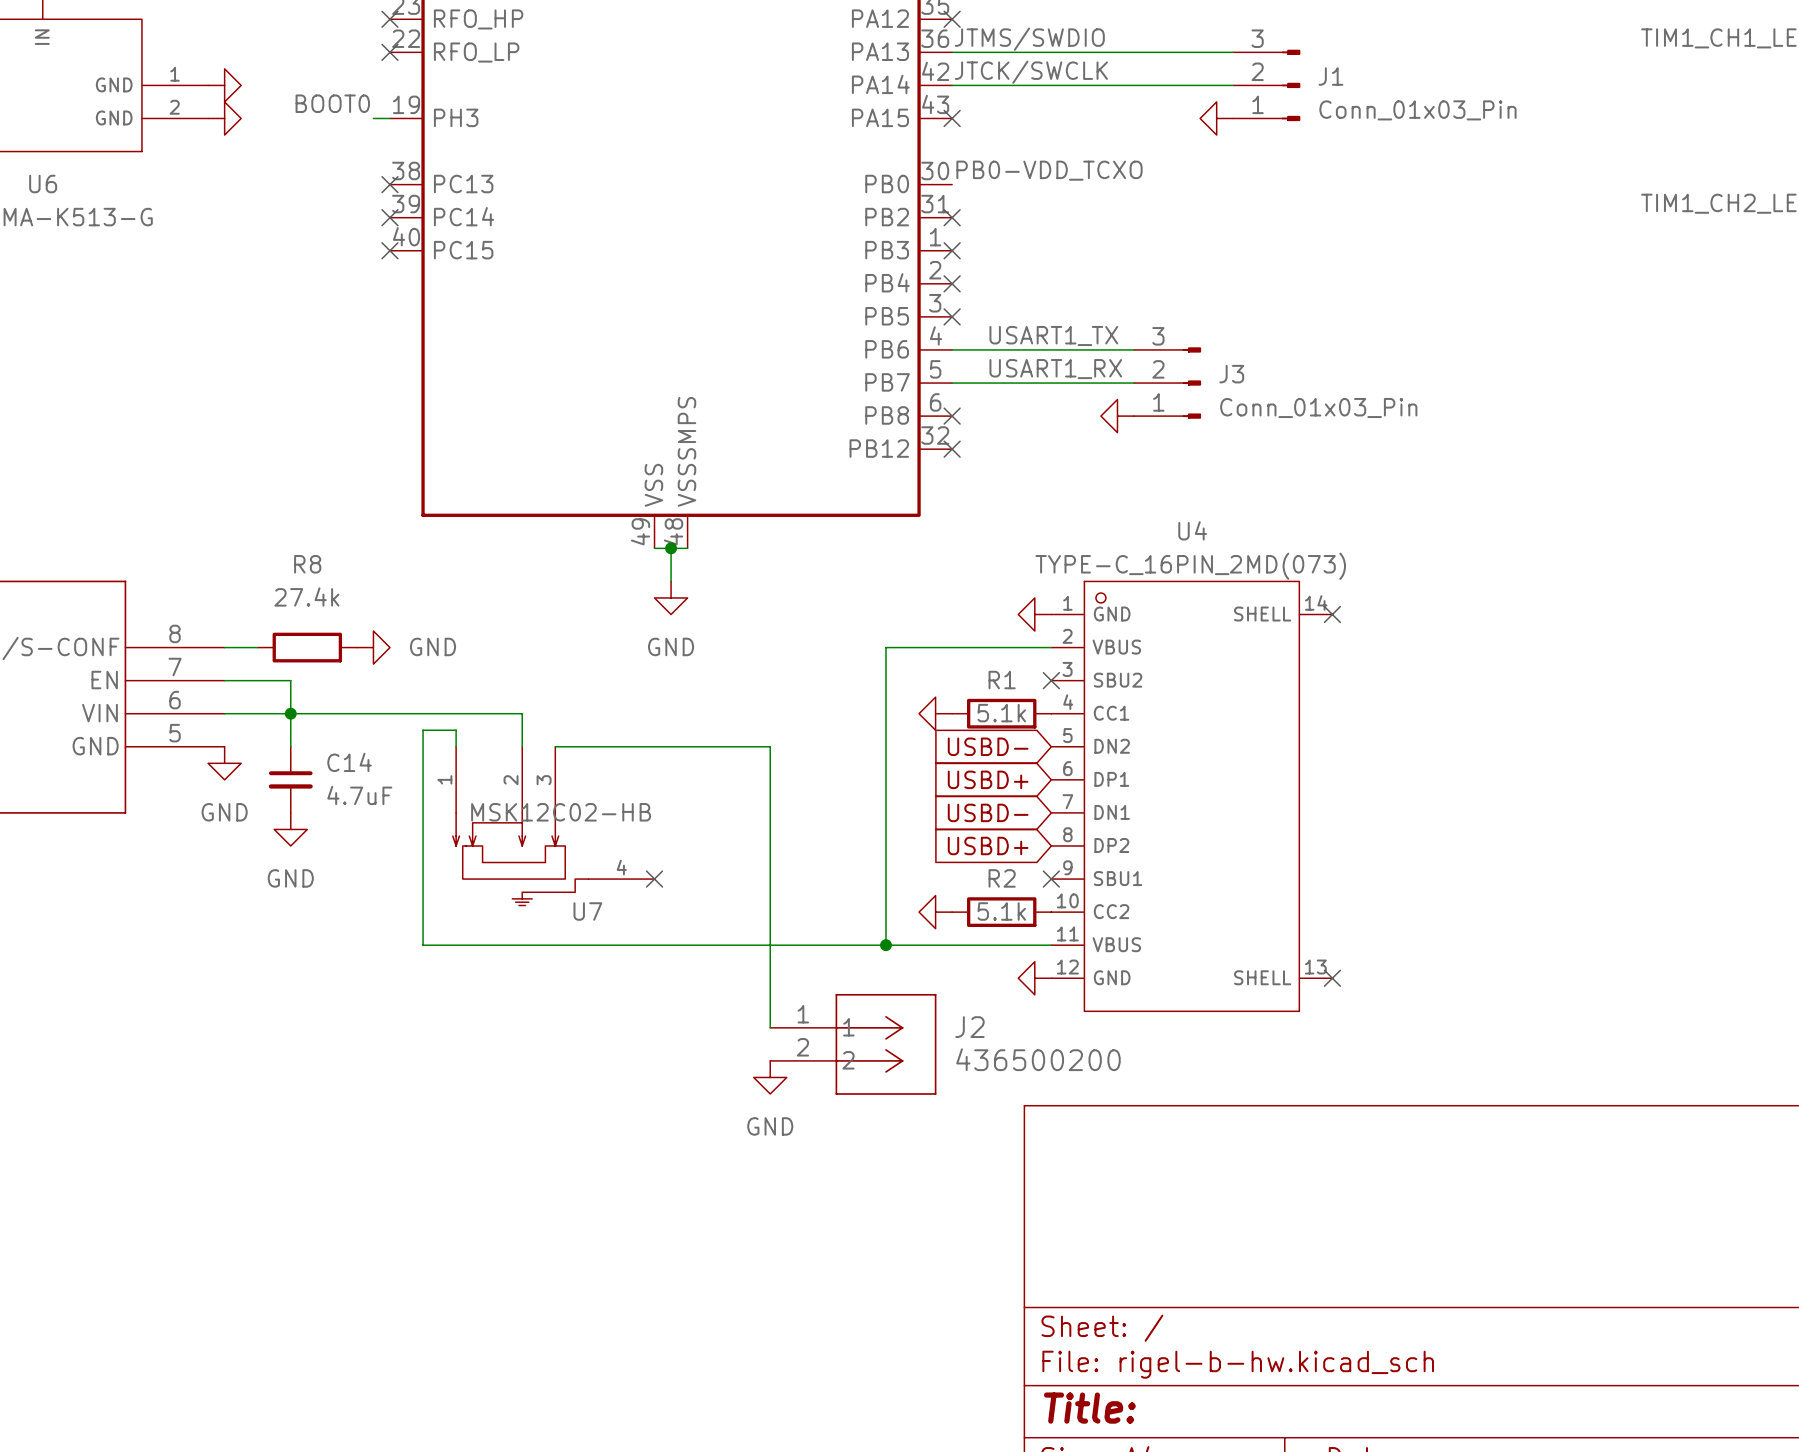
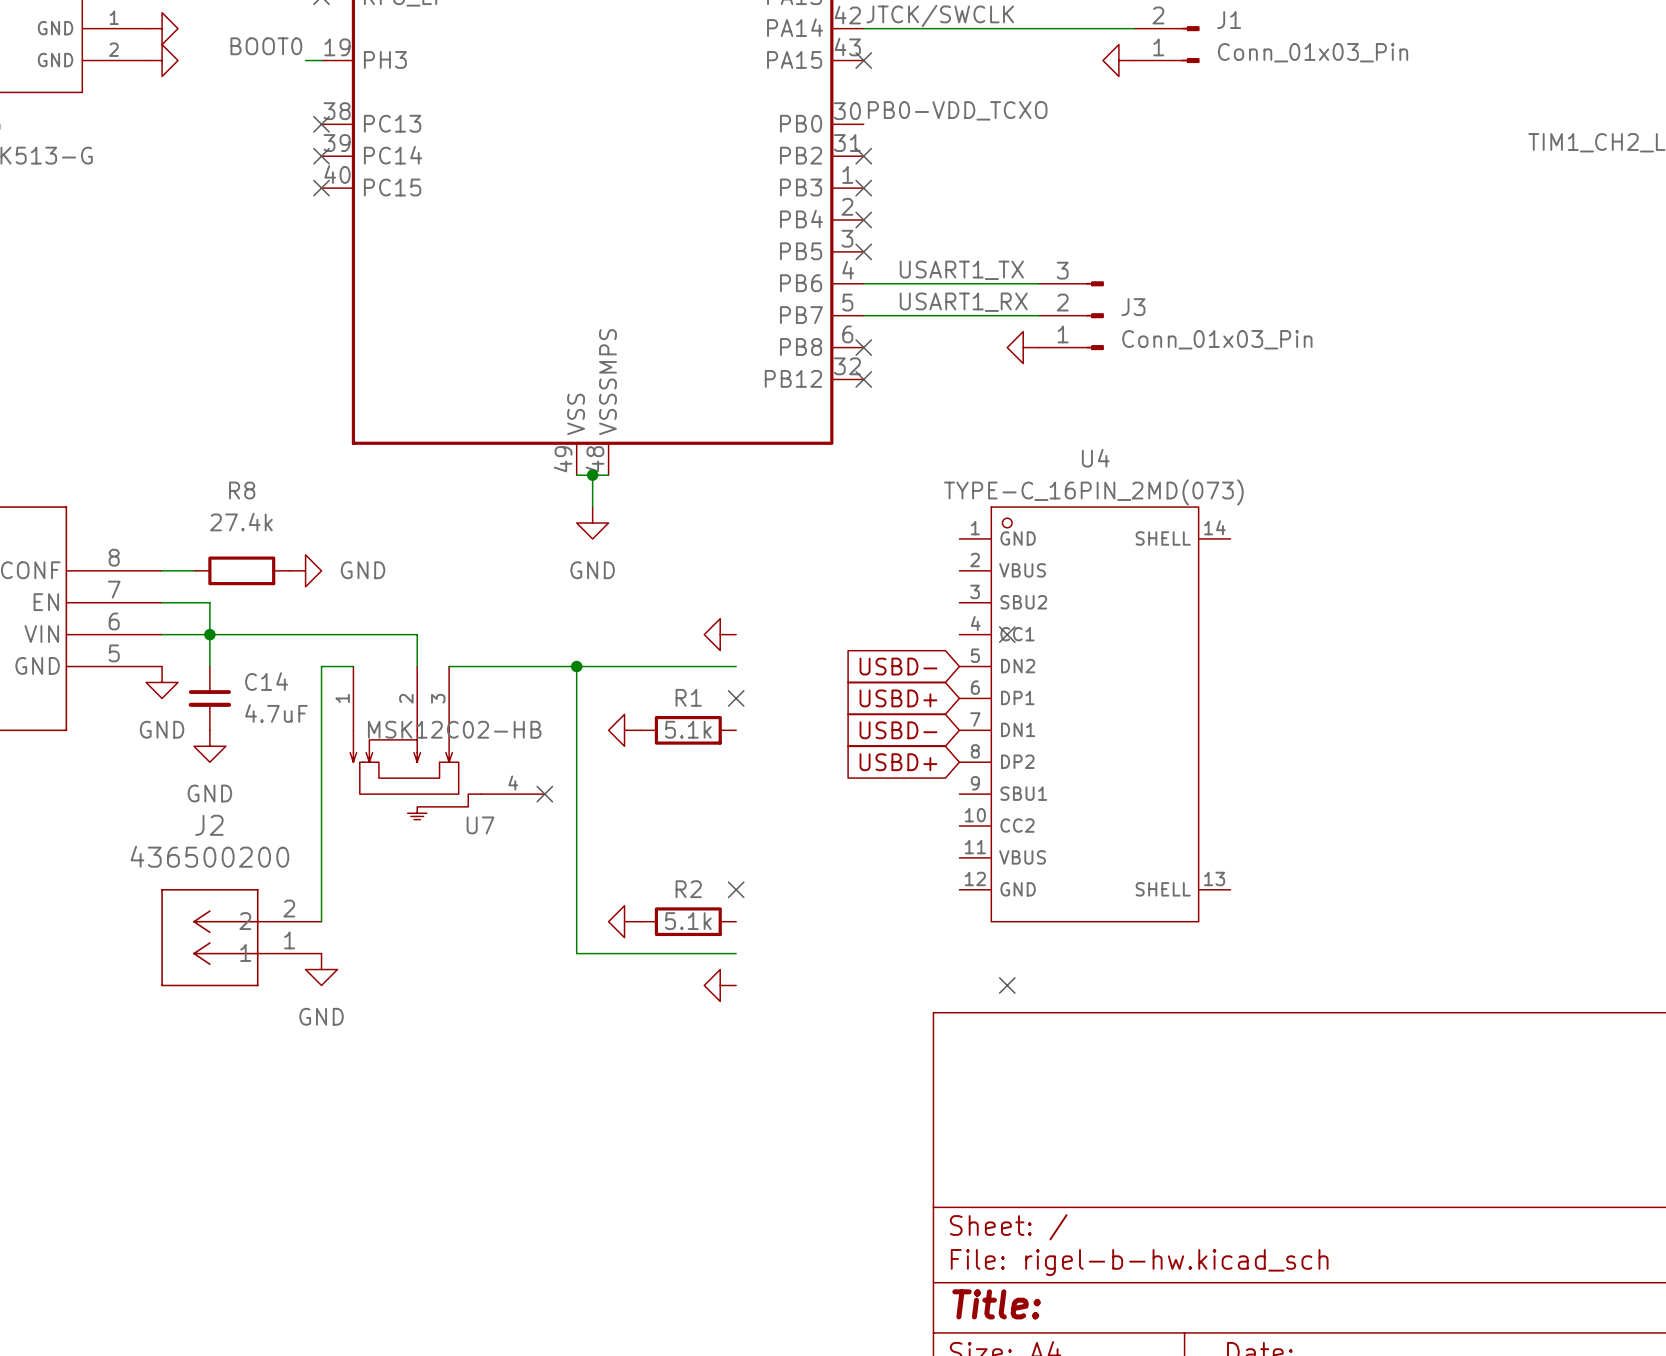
power symbol: (1034, 614) -> none
no-connect mark: (1332, 614) -> none
wire: (1051, 647) (886, 647) (886, 945) -> none
wire: (274, 680) (290, 680) (290, 746) -> (209, 602) (209, 666)
no-connect mark position: (1051, 680) -> (1007, 634)
junction position: (290, 713) -> (209, 634)
wire: (489, 713) (522, 713) (522, 746) -> (417, 634) (417, 666)
power symbol: none -> (720, 634)
power symbol: (935, 713) -> none
R1 position: (1001, 713) -> (688, 730)
wire: none -> (353, 666) (321, 666) (321, 921)
wire: (456, 746) (456, 730) (423, 730) (423, 945) (1051, 945) -> none
wire: none -> (449, 666) (481, 666)
wire: none -> (576, 666) (576, 953) (736, 953)
junction: none -> (576, 666)
wire: (770, 746) (770, 1027) -> (688, 666) (736, 666)
C14 position: (290, 779) -> (209, 698)
no-connect mark: none -> (736, 698)
power symbol: none -> (624, 730)
U7 position: (553, 826) -> (447, 743)
power symbol position: GND (290, 829) -> GND (209, 746)
no-connect mark position: (654, 879) -> (544, 794)
no-connect mark: (1051, 879) -> none
power symbol: (935, 912) -> none
R2 position: (1001, 912) -> (688, 921)
junction: (886, 945) -> none
no-connect mark: none -> (736, 889)
power symbol: (1034, 978) -> none
no-connect mark: (1332, 978) -> none
power symbol: none -> (624, 921)
J2 name position: J2 (969, 1027) -> J2 (209, 825)
J2 position: (853, 1044) -> (241, 937)
J2 rotation: 0° (886, 1044) -> 180° (209, 937)
J2 value position: 436500200 (1038, 1059) -> 436500200 (209, 856)
power symbol: none -> GND (321, 969)
power symbol: GND (770, 1077) -> none
power symbol: none -> (720, 985)
no-connect mark: none -> (1007, 985)

